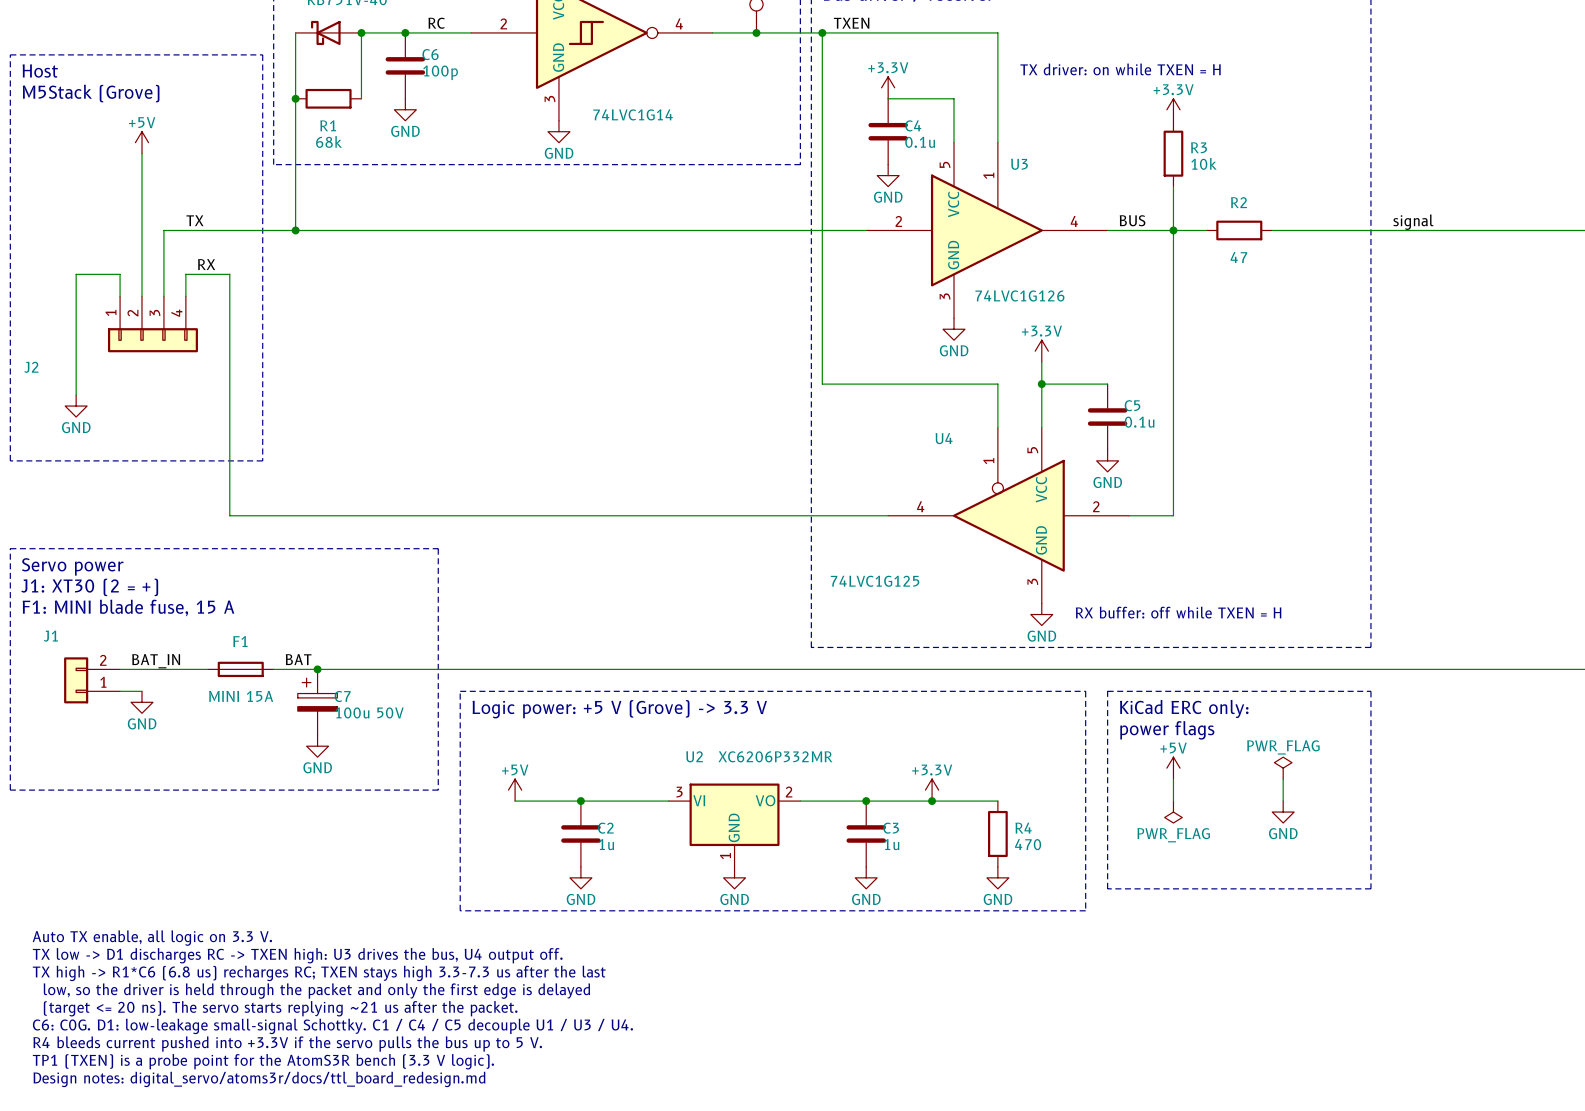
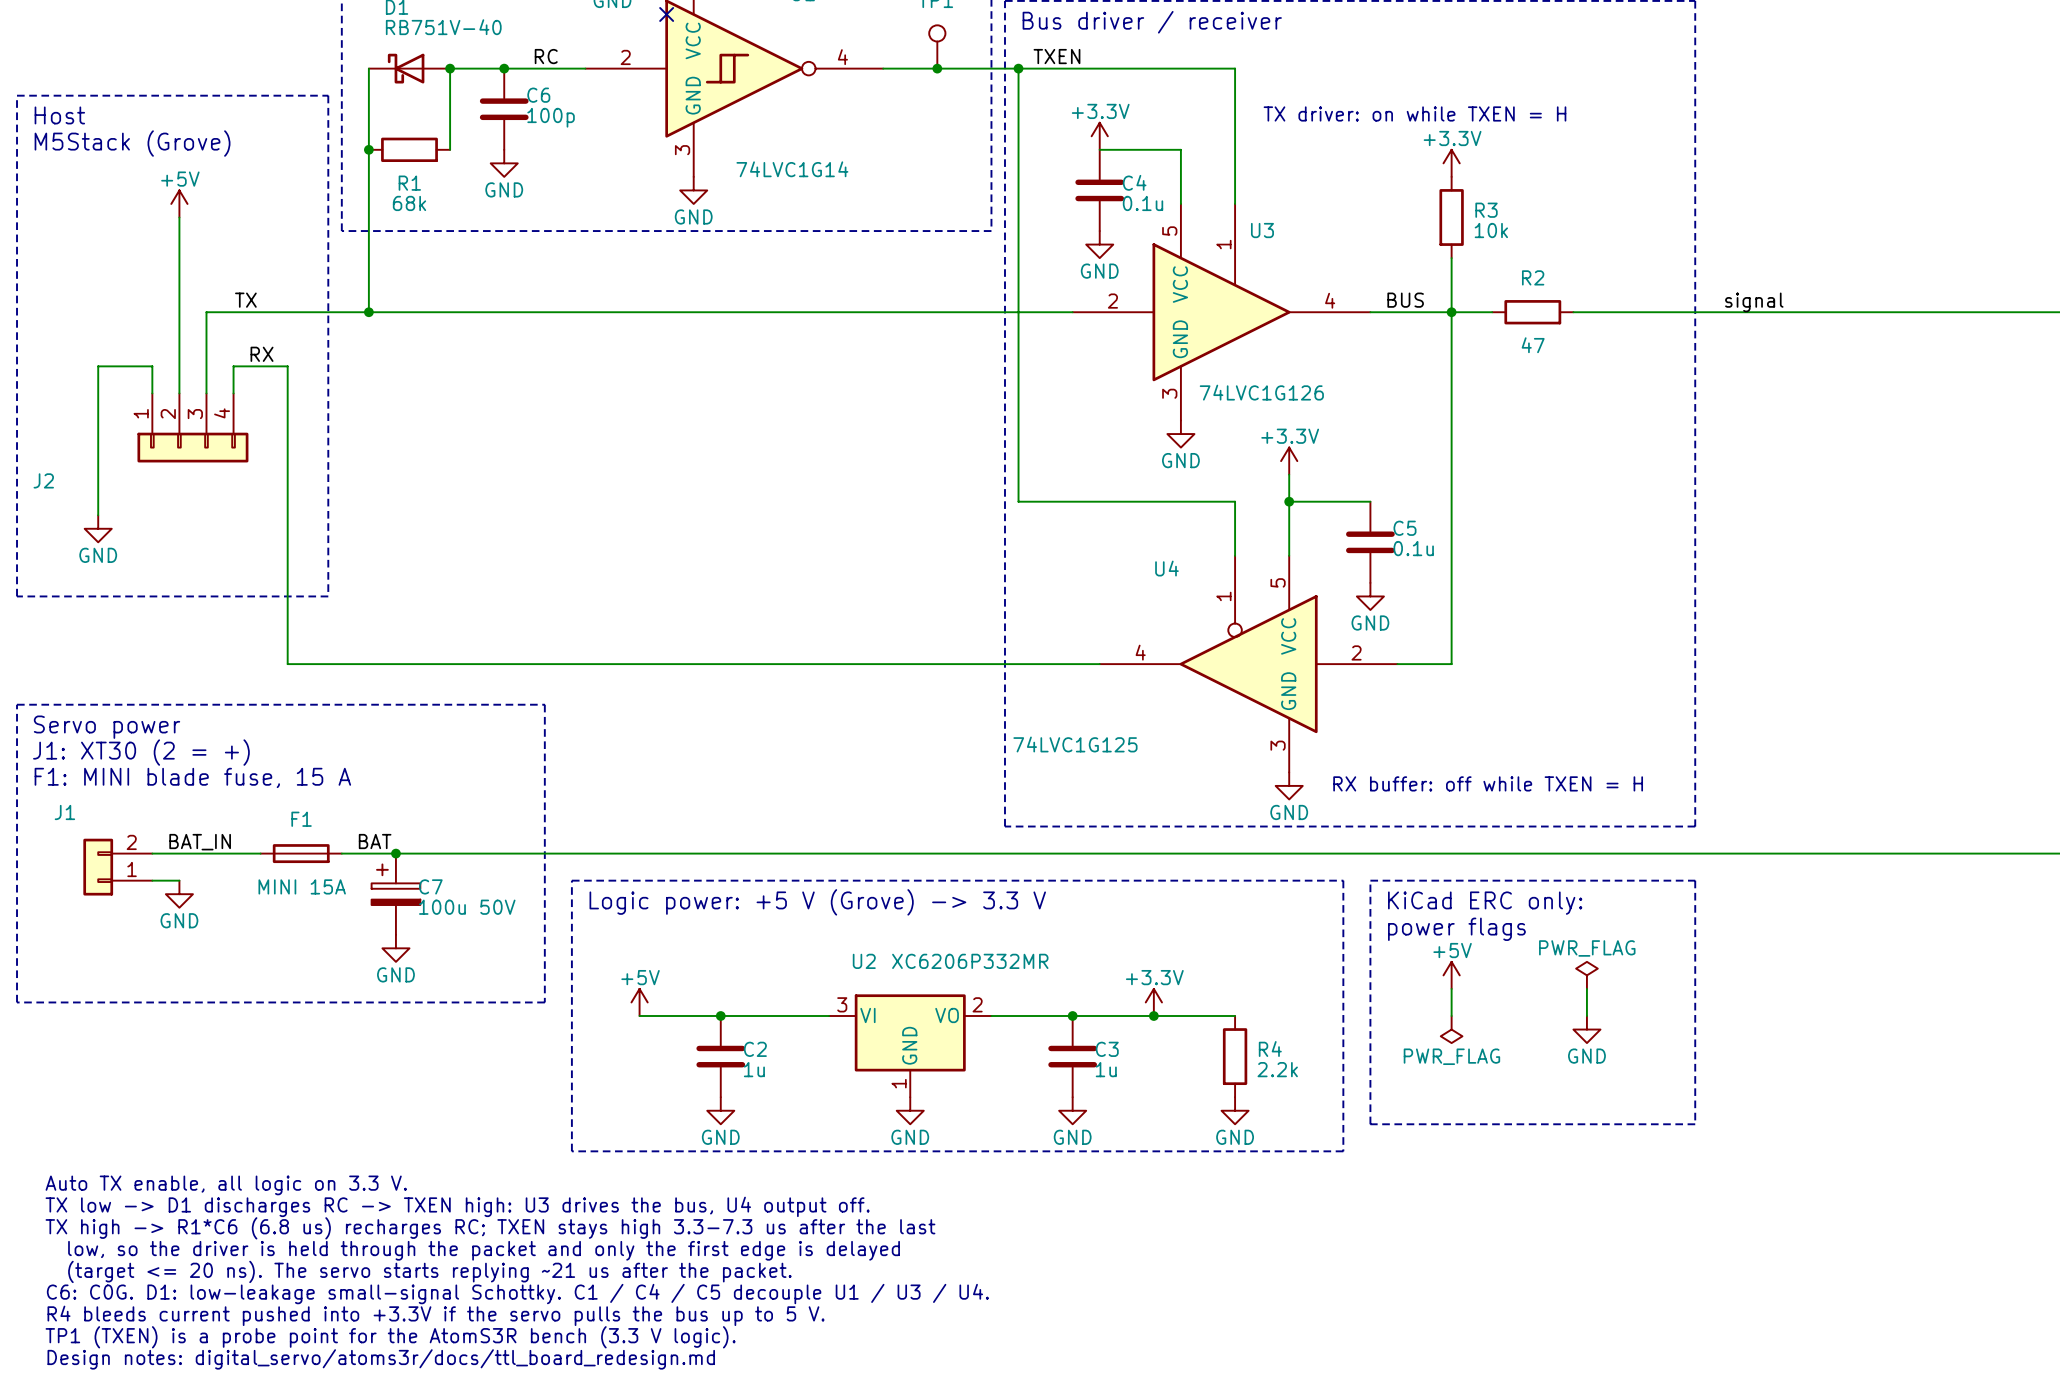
R4 value: 470 (1028, 844) -> 2.2k (1277, 1069)

